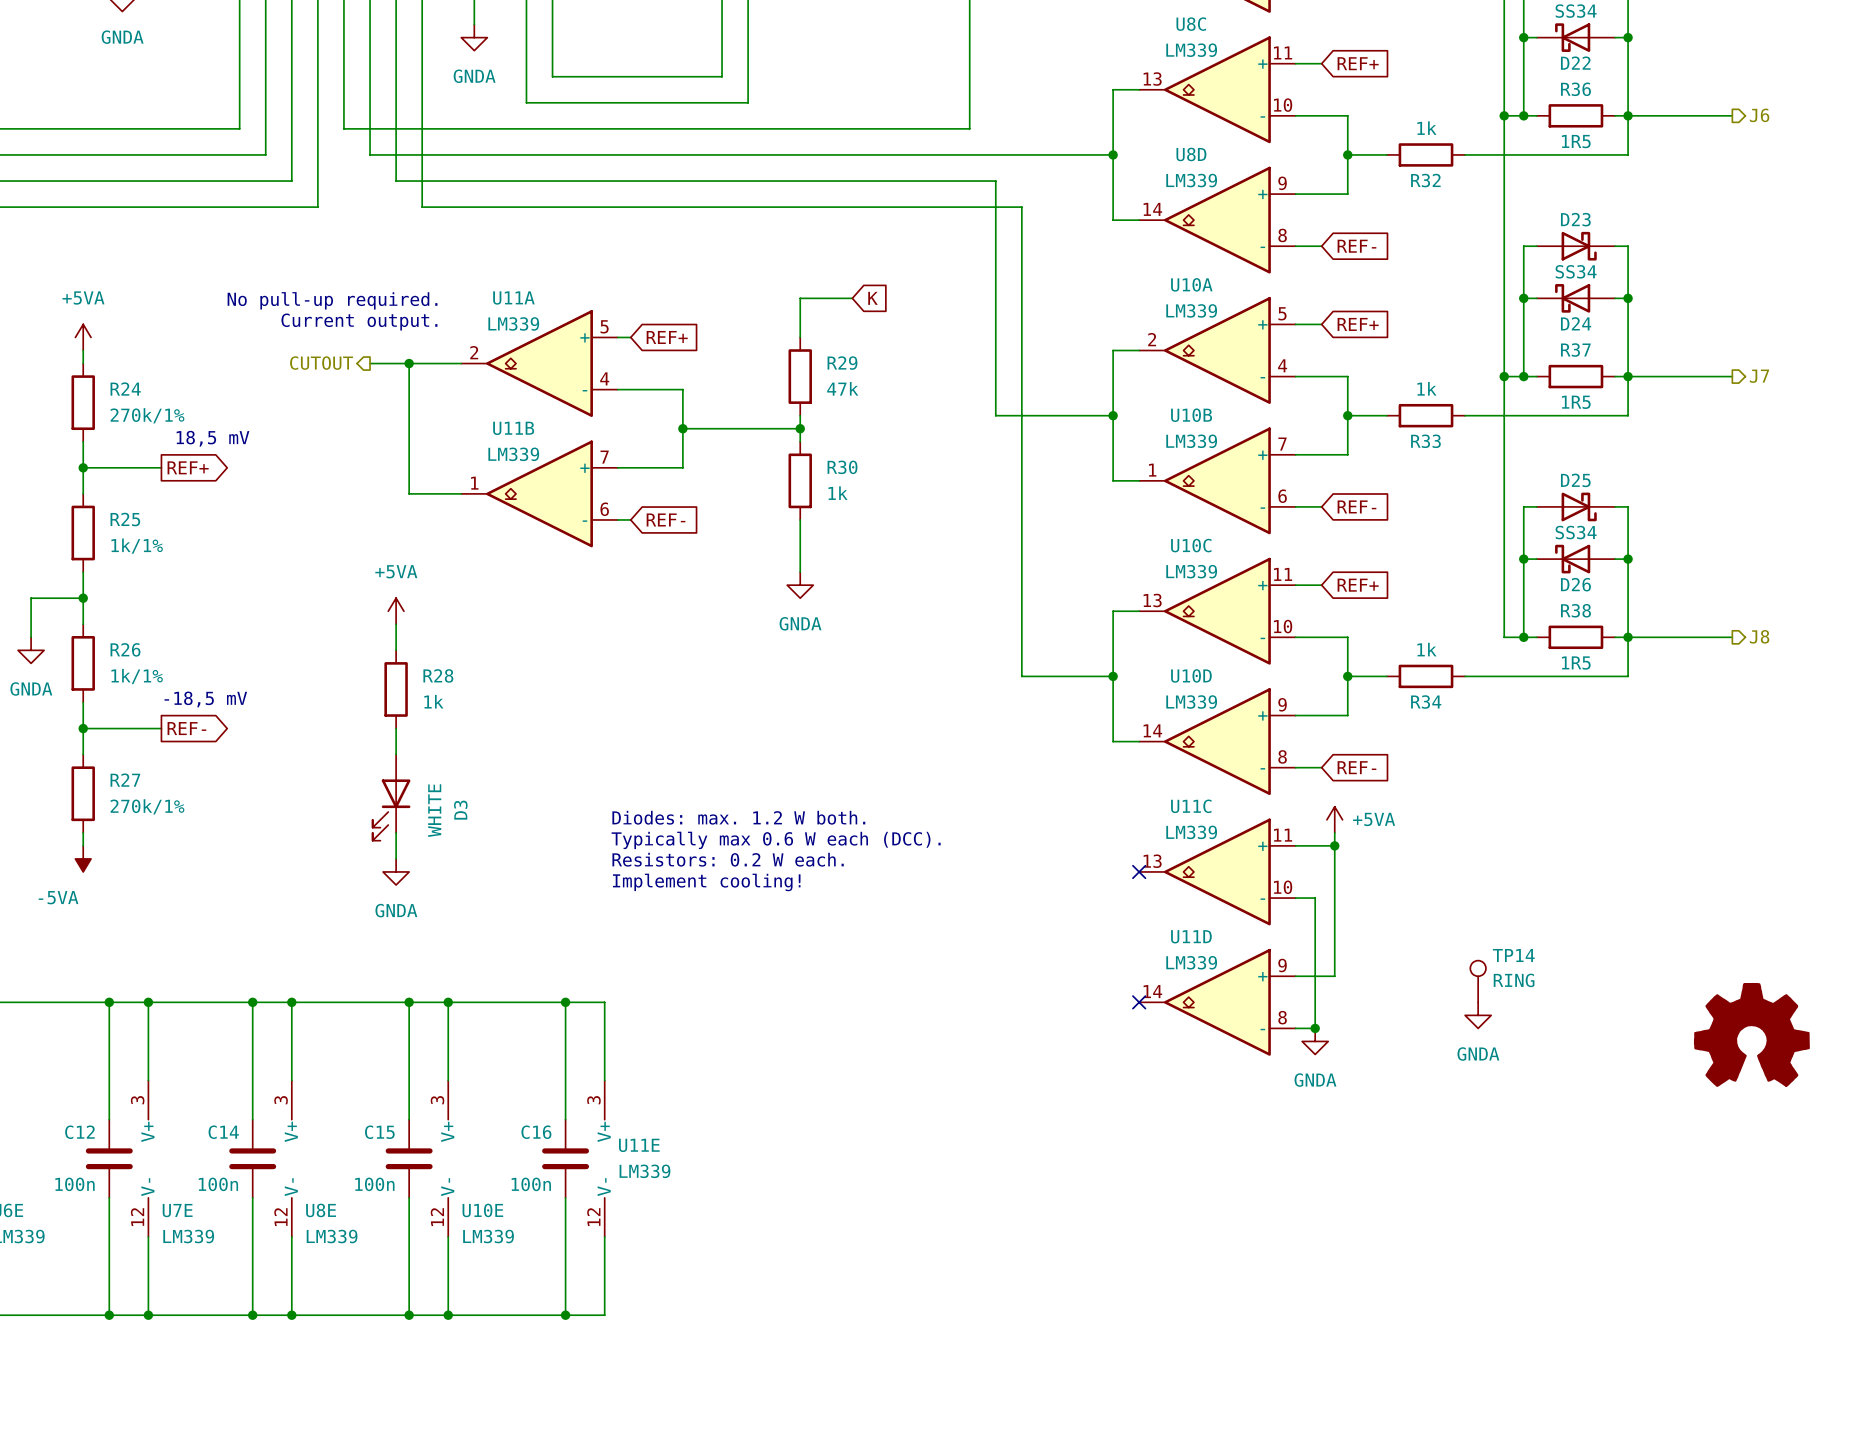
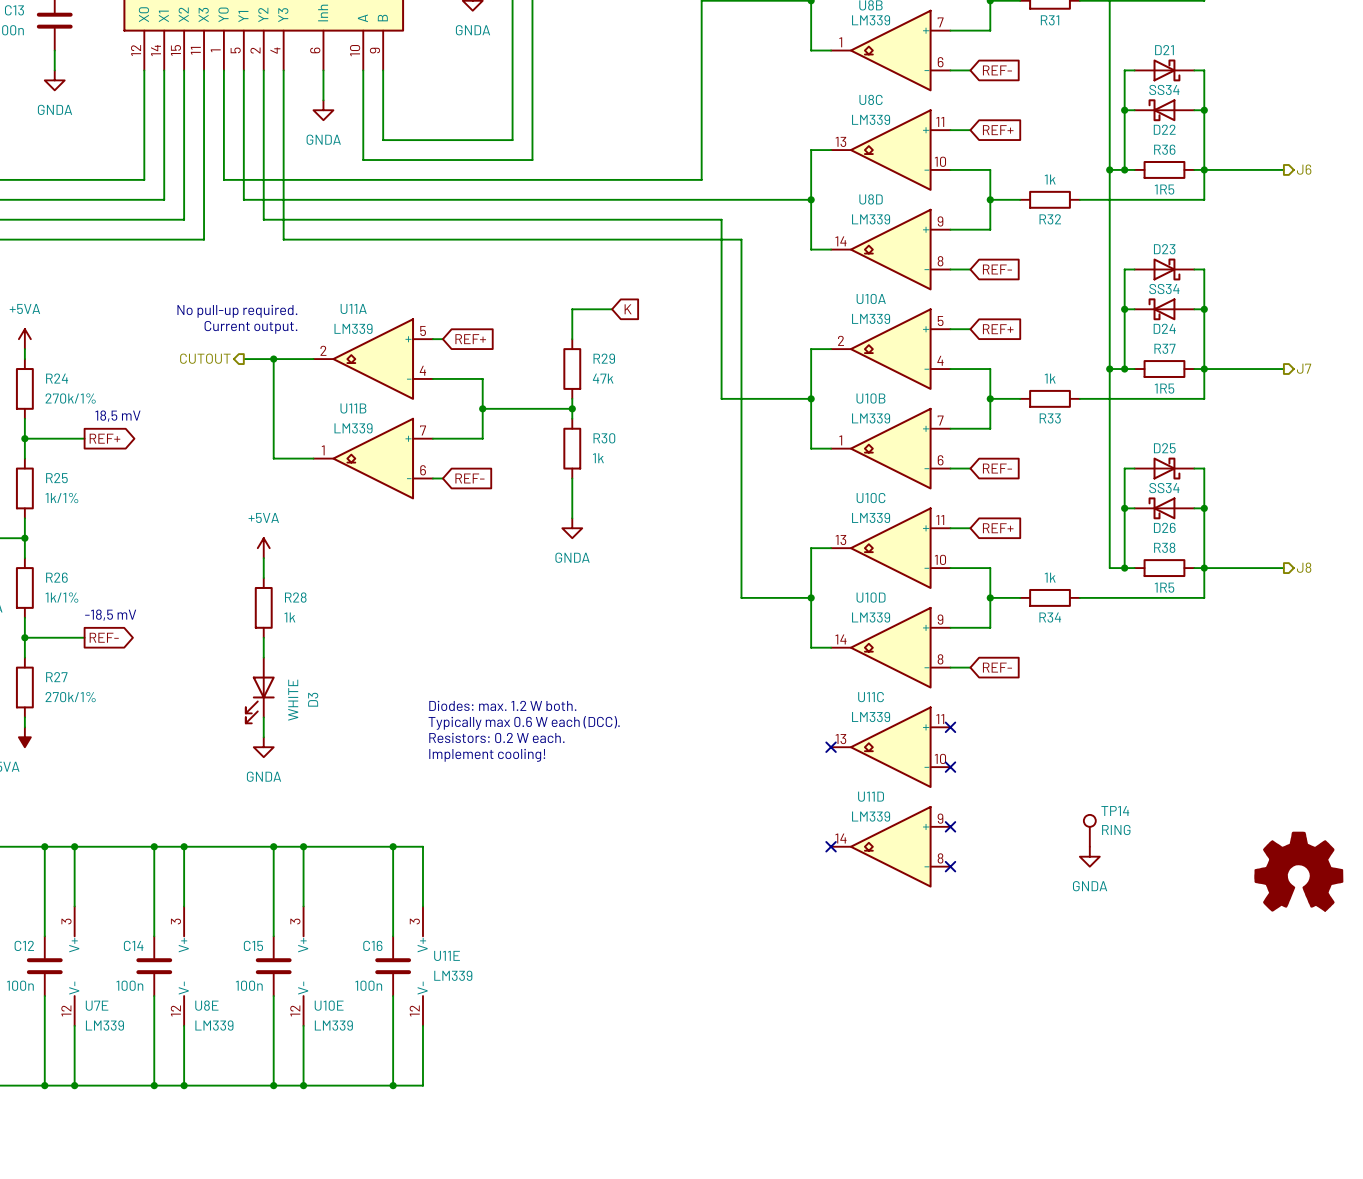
power symbol: +5VA (1334, 819) -> none
wire: (1334, 832) (1334, 976) (1295, 976) -> none
wire: (1295, 845) (1334, 845) -> none
no-connect mark: none -> (950, 727)
junction: (1334, 845) -> none
wire: (1295, 898) (1315, 898) (1315, 1028) (1295, 1028) -> none
no-connect mark: none -> (950, 767)
no-connect mark: none -> (950, 826)
no-connect mark: none -> (950, 866)
junction: (1315, 1028) -> none
power symbol: GNDA (1315, 1041) -> none

